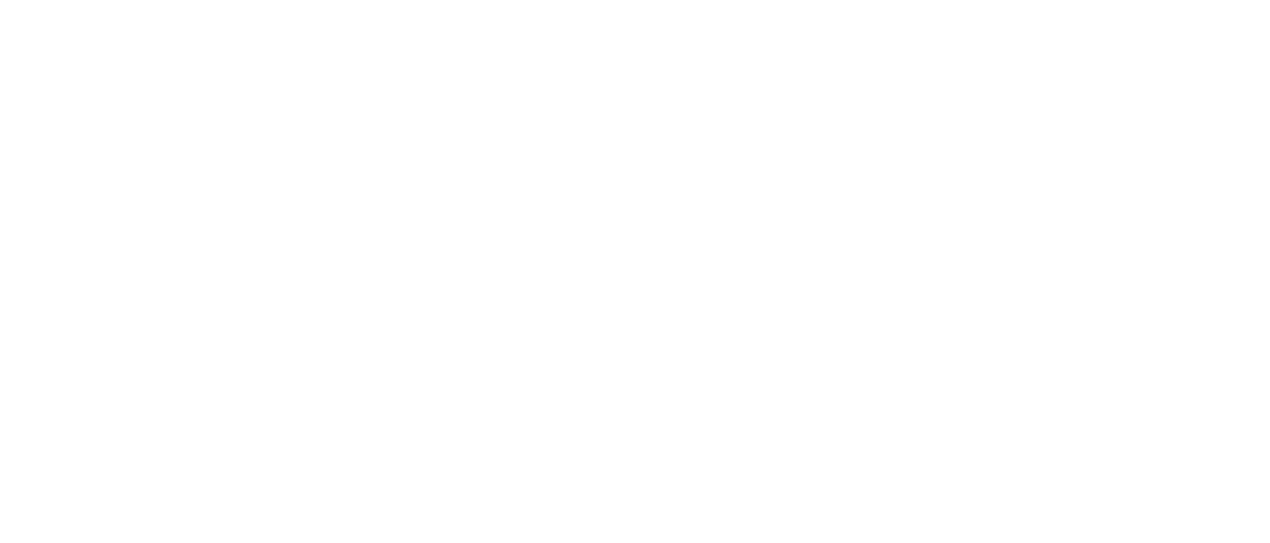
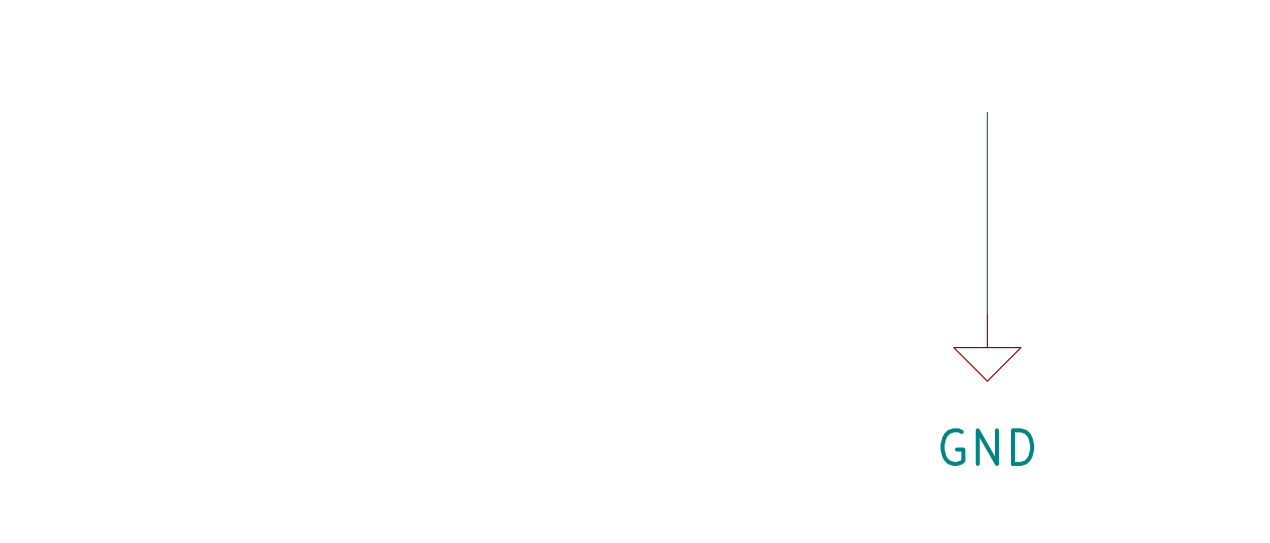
wire: none -> (987, 112) (987, 313)
power symbol: none -> GND (987, 347)

